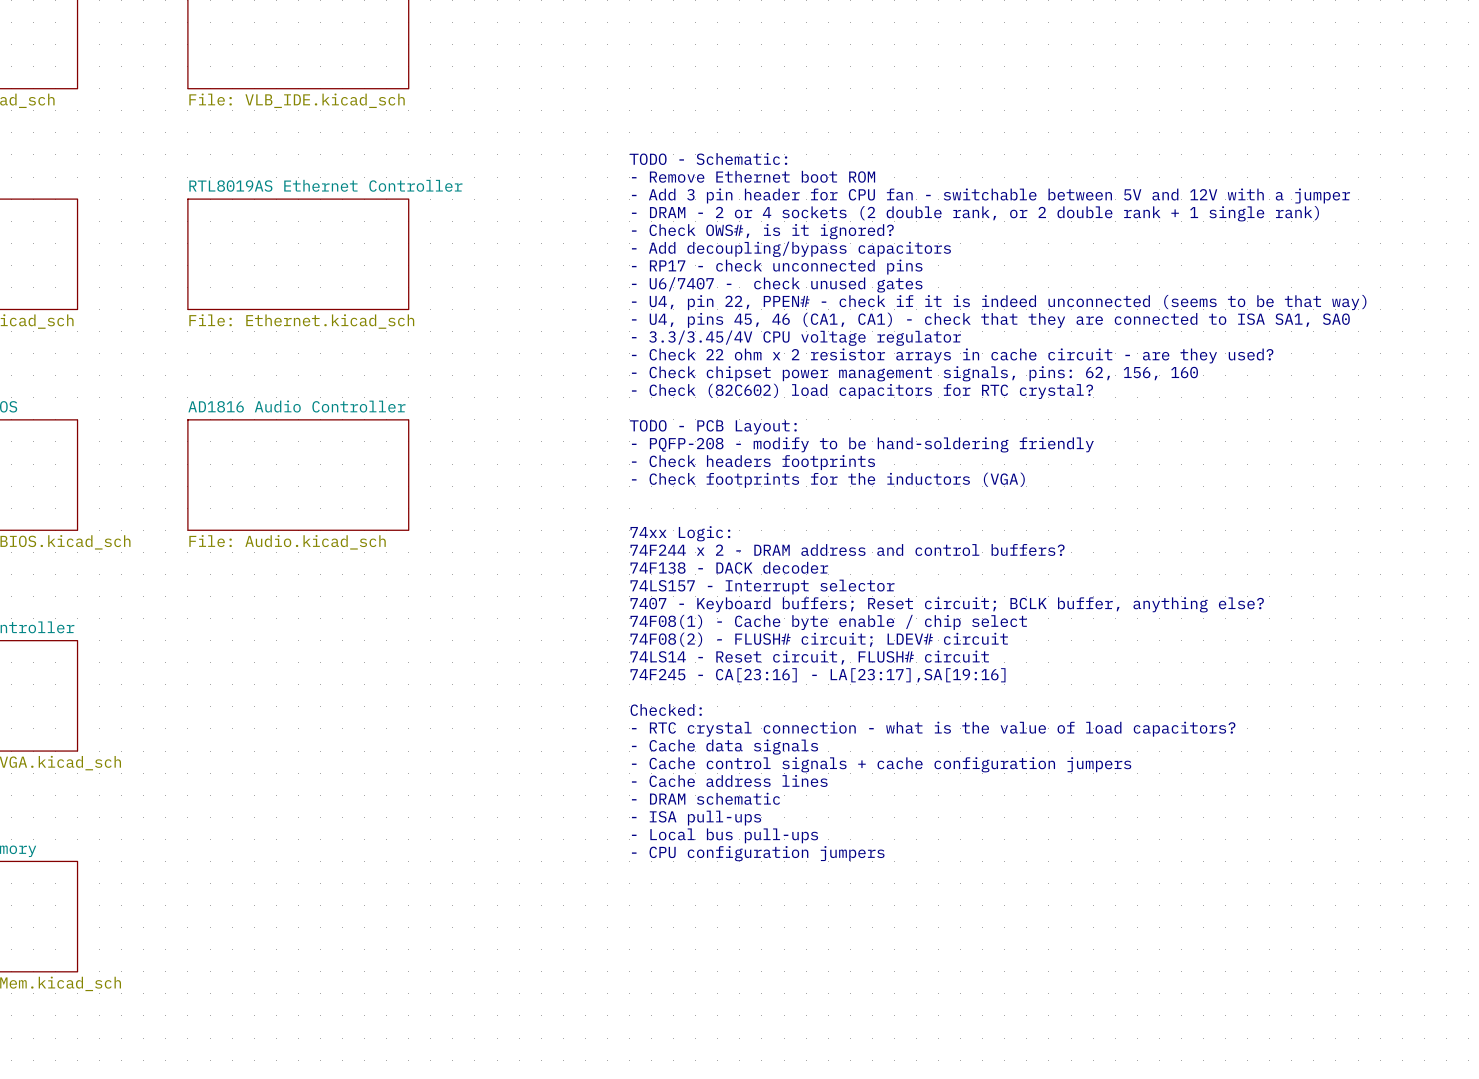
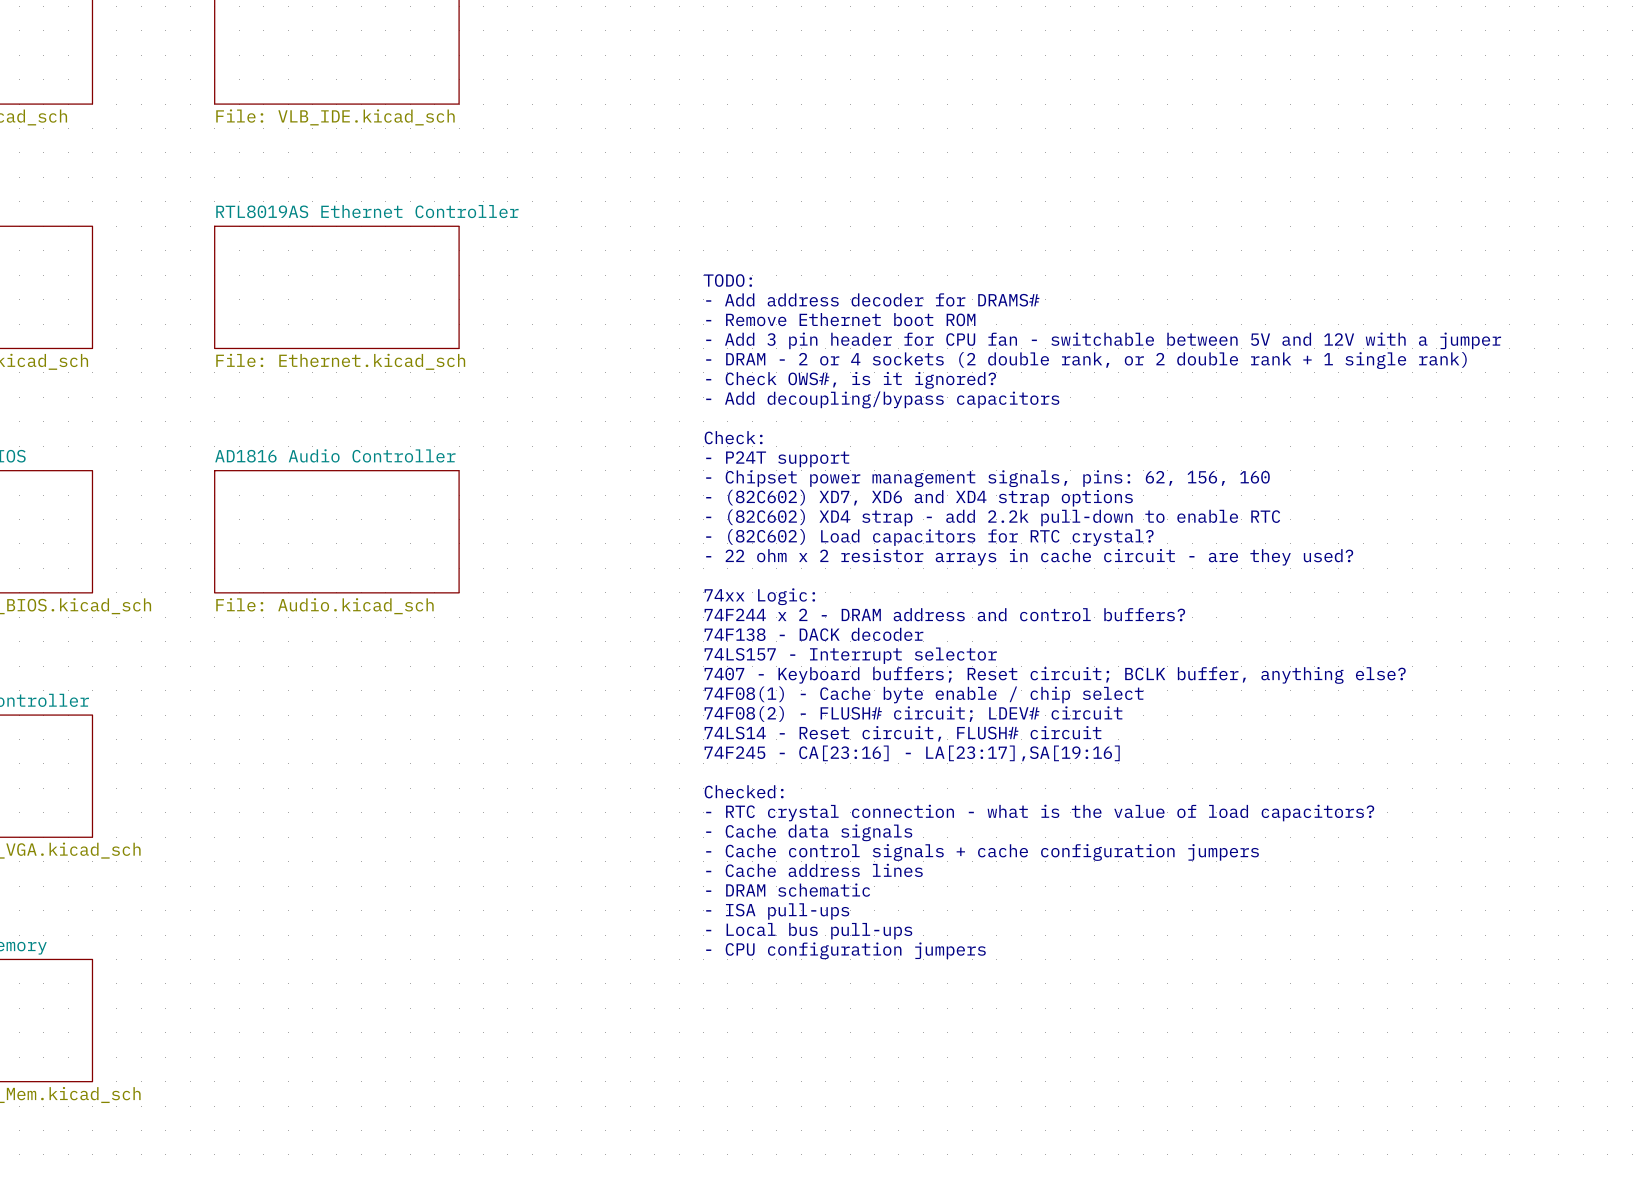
text: TODO - Schematic: (708, 158) -> none
text: - Remove Ethernet boot ROM (753, 176) -> none
text: - Add 3 pin header for CPU fan - switchable between 5V and 12V with a jumper (990, 195) -> none
text: - DRAM - 2 or 4 sockets (2 double rank, or 2 double rank + 1 single rank) (975, 213) -> none
text: - Check OWS#, is it ignored? (762, 231) -> none
text: - Add decoupling/bypass capacitors (791, 249) -> TODO: (727, 280)
text: - RP17 - check unconnected pins (777, 267) -> - Add address decoder for DRAMS# (872, 299)
text: - U6/7407 - check unused gates (777, 284) -> - Remove Ethernet boot ROM (840, 319)
text: - U4, pin 22, PPEN# - check if it is indeed unconnected (seems to be that way) (999, 302) -> - Add 3 pin header for CPU fan - switchable between 5V and 12V with a jumper (1103, 340)
text: - U4, pins 45, 46 (CA1, CA1) - check that they are connected to ISA SA1, SA0 (990, 320) -> - DRAM - 2 or 4 sockets (2 double rank, or 2 double rank + 1 single rank) (1086, 360)
text: - 3.3/3.45/4V CPU voltage regulator (796, 338) -> - Check OWS#, is it ignored? (851, 380)
text: - Check 22 ohm x 2 resistor arrays in cache circuit - are they used? (952, 355) -> - Add decoupling/bypass capacitors (882, 399)
text: - Check chipset power management signals, pins: 62, 156, 160 (914, 373) -> none
text: - Check (82C602) load capacitors for RTC crystal? (862, 391) -> Check: (733, 437)
text: none -> - P24T support (777, 459)
text: TODO - PCB Layout: (713, 427) -> - Chipset power management signals, pins: 62, 156, 160 (987, 478)
text: - PQFP-208 - modify to be hand-soldering friendly (862, 444) -> - (82C602) XD7, XD6 and XD4 strap options (919, 498)
text: - Check headers footprints (753, 462) -> - (82C602) XD4 strap - add 2.2k pull-down to enable RTC (993, 517)
text: - Check footprints for the inductors (VGA) (828, 480) -> - (82C602) Load capacitors for RTC crystal? (929, 537)
text: none -> - 22 ohm x 2 resistor arrays in cache circuit - are they used? (1029, 557)

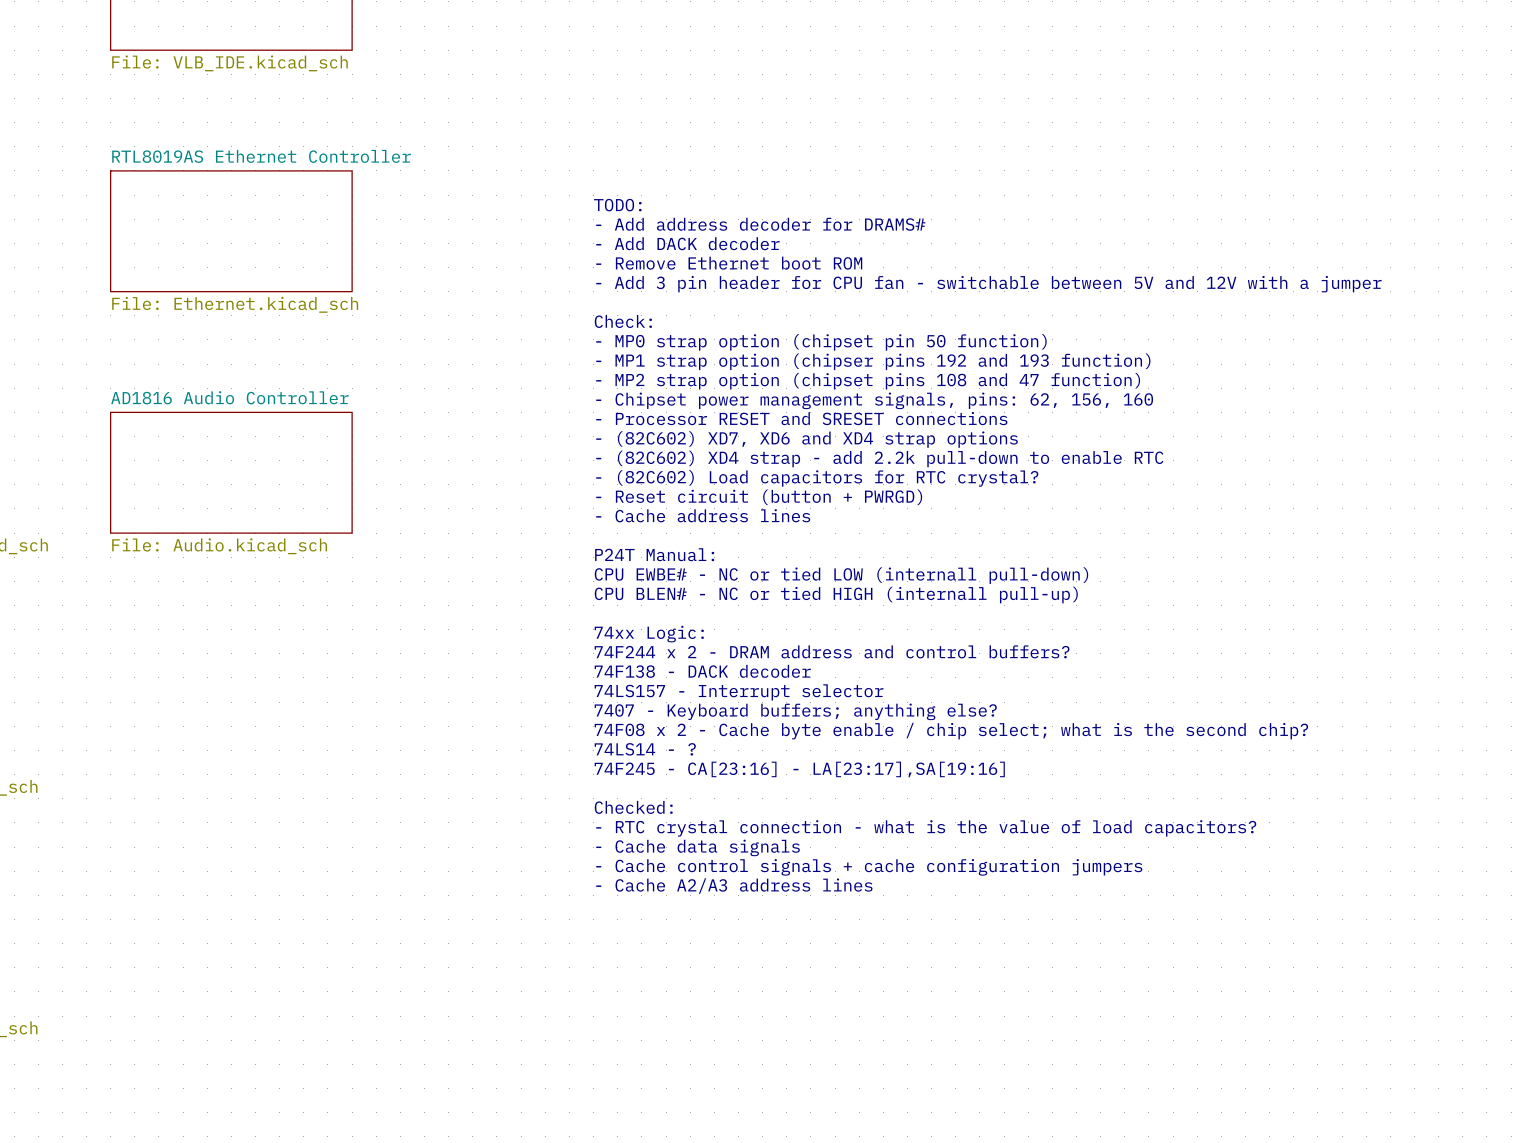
text: none -> TODO: (617, 205)
text: TODO: (727, 280) -> - Add address decoder for DRAMS# (760, 224)
text: - Add address decoder for DRAMS# (872, 299) -> - Add DACK decoder (687, 243)
text: - DRAM - 2 or 4 sockets (2 double rank, or 2 double rank + 1 single rank) (1086, 360) -> none
text: - Check OWS#, is it ignored? (851, 380) -> Check: (623, 321)
text: - Add decoupling/bypass capacitors (882, 399) -> - MP0 strap option (chipset pin 50 function) (821, 342)
text: none -> - MP1 strap option (chipser pins 192 and 193 function) (873, 361)
text: Check: (733, 437) -> - MP2 strap option (chipset pins 108 and 47 function) (868, 381)
text: - P24T support (777, 459) -> - Chipset power management signals, pins: 62, 156, 160 (874, 400)
text: - Chipset power management signals, pins: 62, 156, 160 (987, 478) -> - Processor RESET and SRESET connections (801, 418)
text: - 22 ohm x 2 resistor arrays in cache circuit - are they used? (1029, 557) -> - Reset circuit (button + PWRGD) (759, 497)
text: none -> - Cache address lines (703, 515)
text: 74xx Logic: (759, 596) -> none
text: 74F244 x 2 - DRAM address and control buffers? (944, 614) -> P24T Manual: (654, 554)
text: 74F138 - DACK decoder (813, 634) -> CPU EWBE# - NC or tied LOW (internall pull-down) (841, 575)
text: 74LS157 - Interrupt selector (850, 655) -> CPU BLEN# - NC or tied HIGH (internall pull-up) (836, 595)
text: 7407 - Keyboard buffers; Reset circuit; BCLK buffer, anything else? (1055, 675) -> none
text: 74F08(1) - Cache byte enable / chip select (923, 694) -> 74xx Logic: (649, 634)
text: 74F08(2) - FLUSH# circuit; LDEV# circuit (913, 714) -> 74F244 x 2 - DRAM address and control buffers? (832, 651)
text: 74LS14 - Reset circuit, FLUSH# circuit (902, 733) -> 74F138 - DACK decoder (702, 671)
text: 74F245 - CA[23:16] - LA[23:17],SA[19:16] (912, 753) -> 74LS157 - Interrupt selector (739, 692)
text: none -> 7407 - Keyboard buffers; anything else? (795, 711)
text: Checked: (744, 791) -> 74F08 x 2 - Cache byte enable / chip select; what is the second chip? (951, 731)
text: - RTC crystal connection - what is the value of load capacitors? (1040, 813) -> 74LS14 - ? (645, 749)
text: - Cache data signals (809, 832) -> 74F245 - CA[23:16] - LA[23:17],SA[19:16] (799, 769)
text: - Cache control signals + cache configuration jumpers (982, 852) -> none
text: - Cache address lines (814, 870) -> Checked: (633, 807)
text: - DRAM schematic (788, 890) -> - RTC crystal connection - what is the value of load capacitors? (926, 828)
text: - ISA pull-ups (777, 911) -> - Cache data signals (698, 847)
text: - Local bus pull-ups (809, 931) -> - Cache control signals + cache configuration jumpers (869, 867)
text: - CPU configuration jumpers (845, 950) -> - Cache A2/A3 address lines (734, 886)

